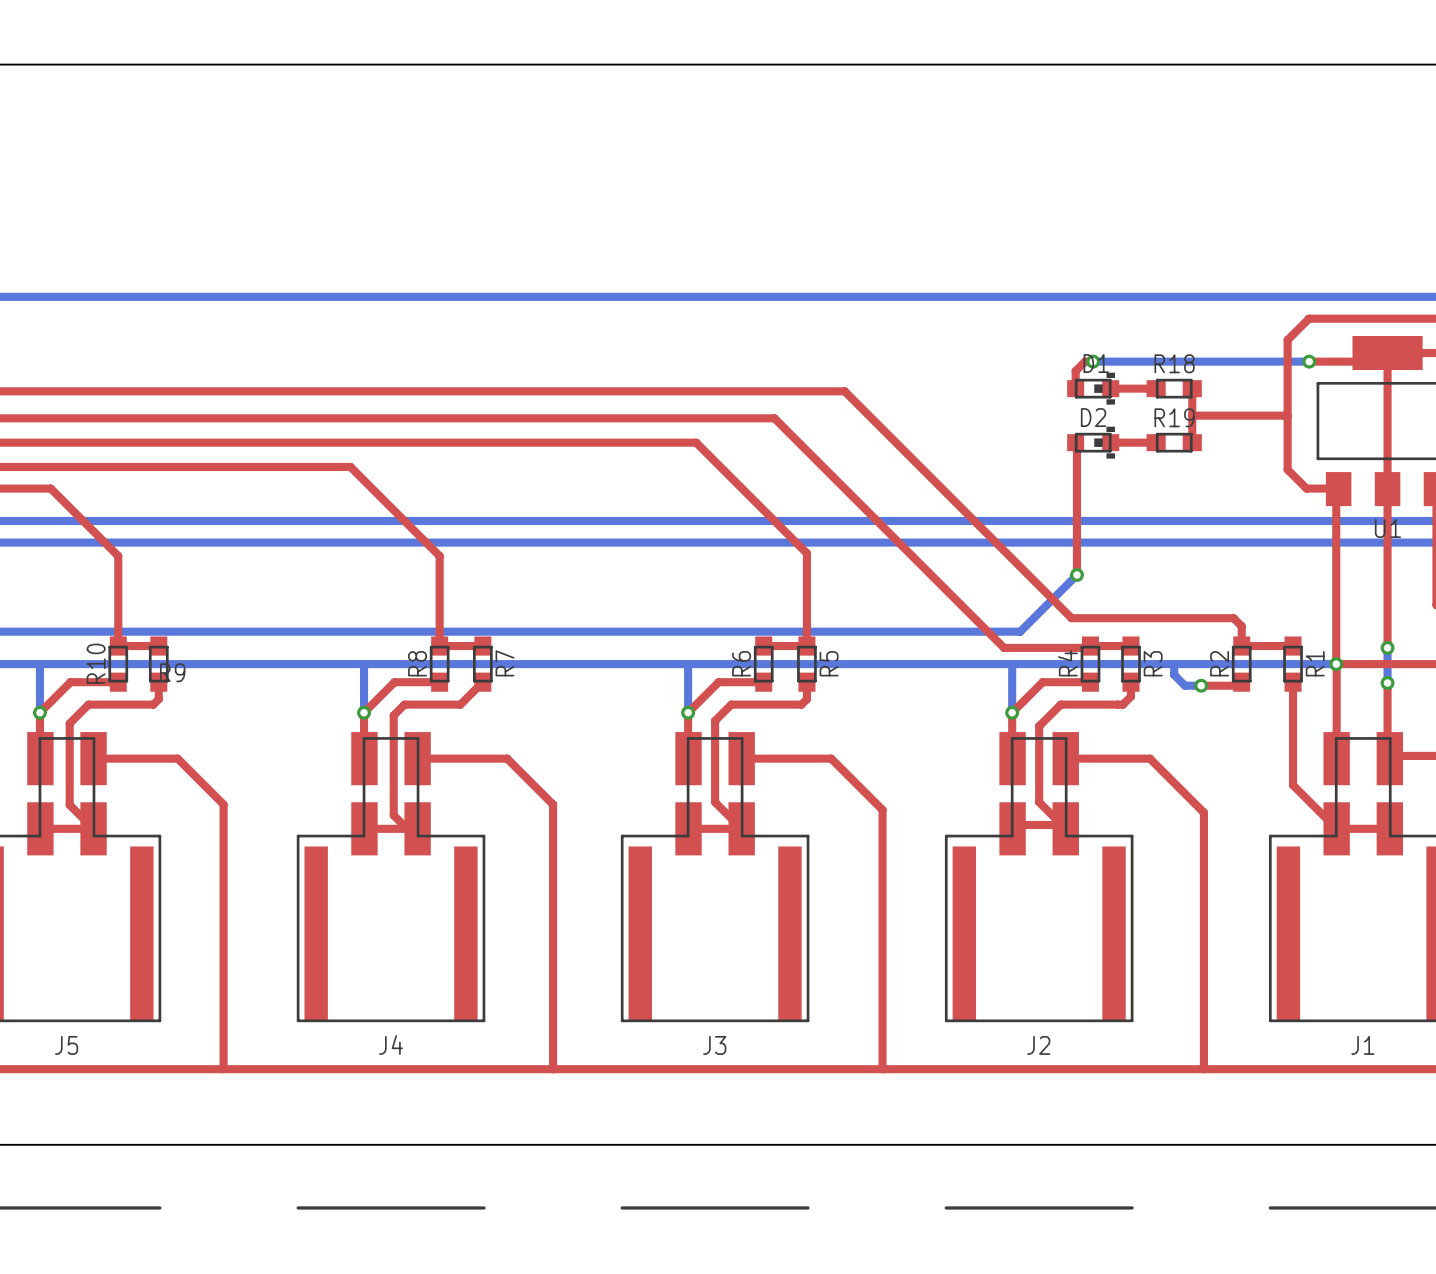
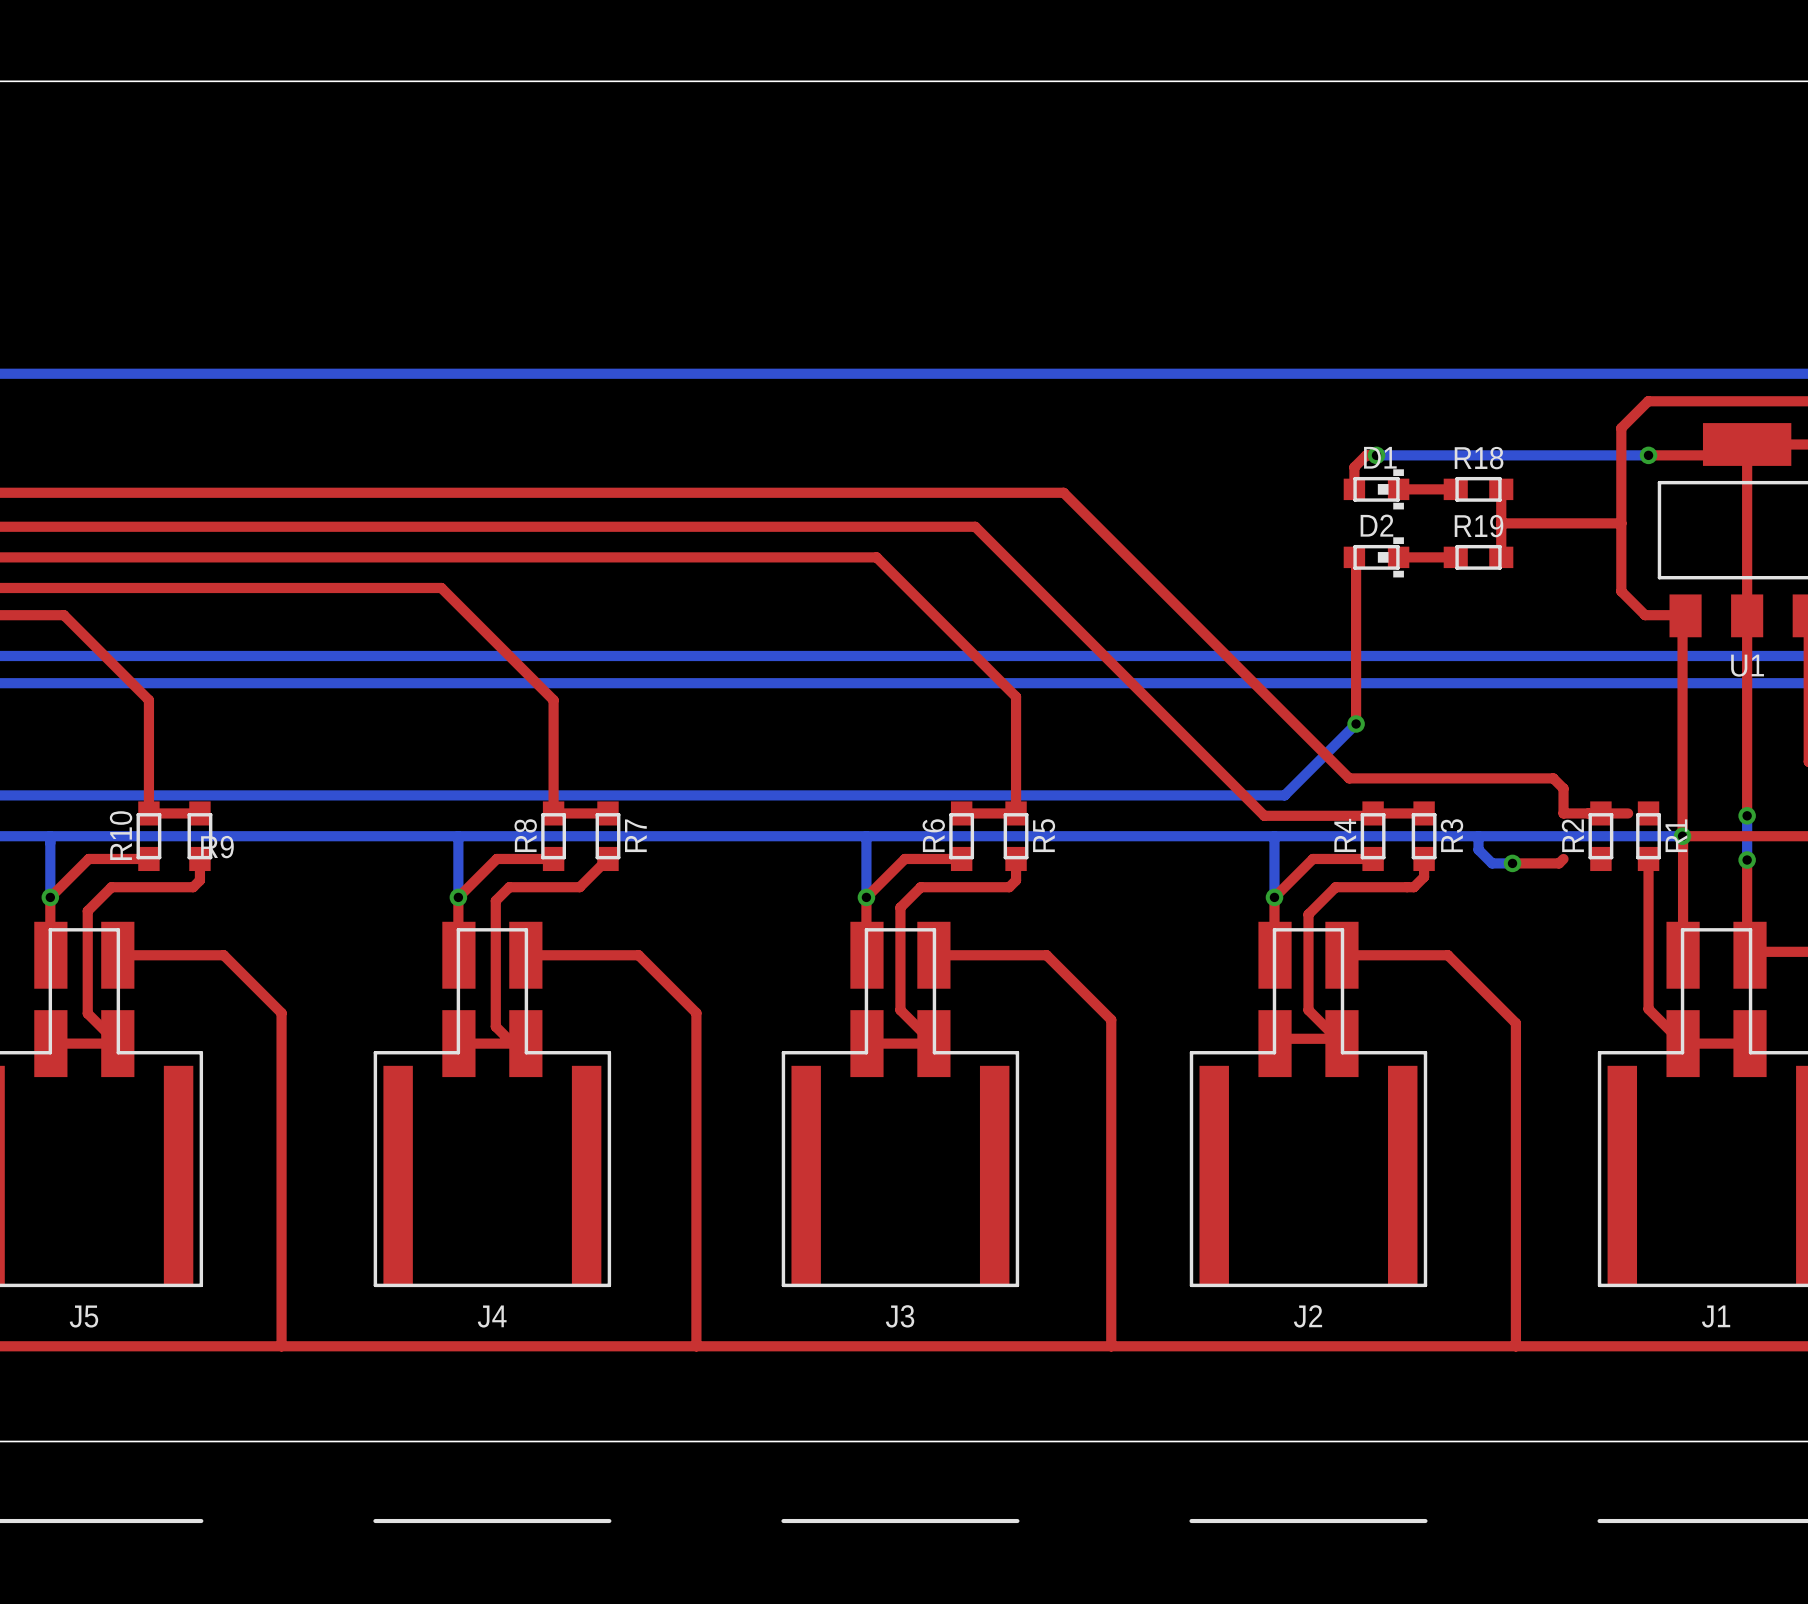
R2 position: (1241, 664) -> (1600, 836)
R1 position: (1293, 664) -> (1648, 836)
top track: (1293, 682) (1293, 785) (1309, 801) -> (1648, 858) (1648, 1009)

